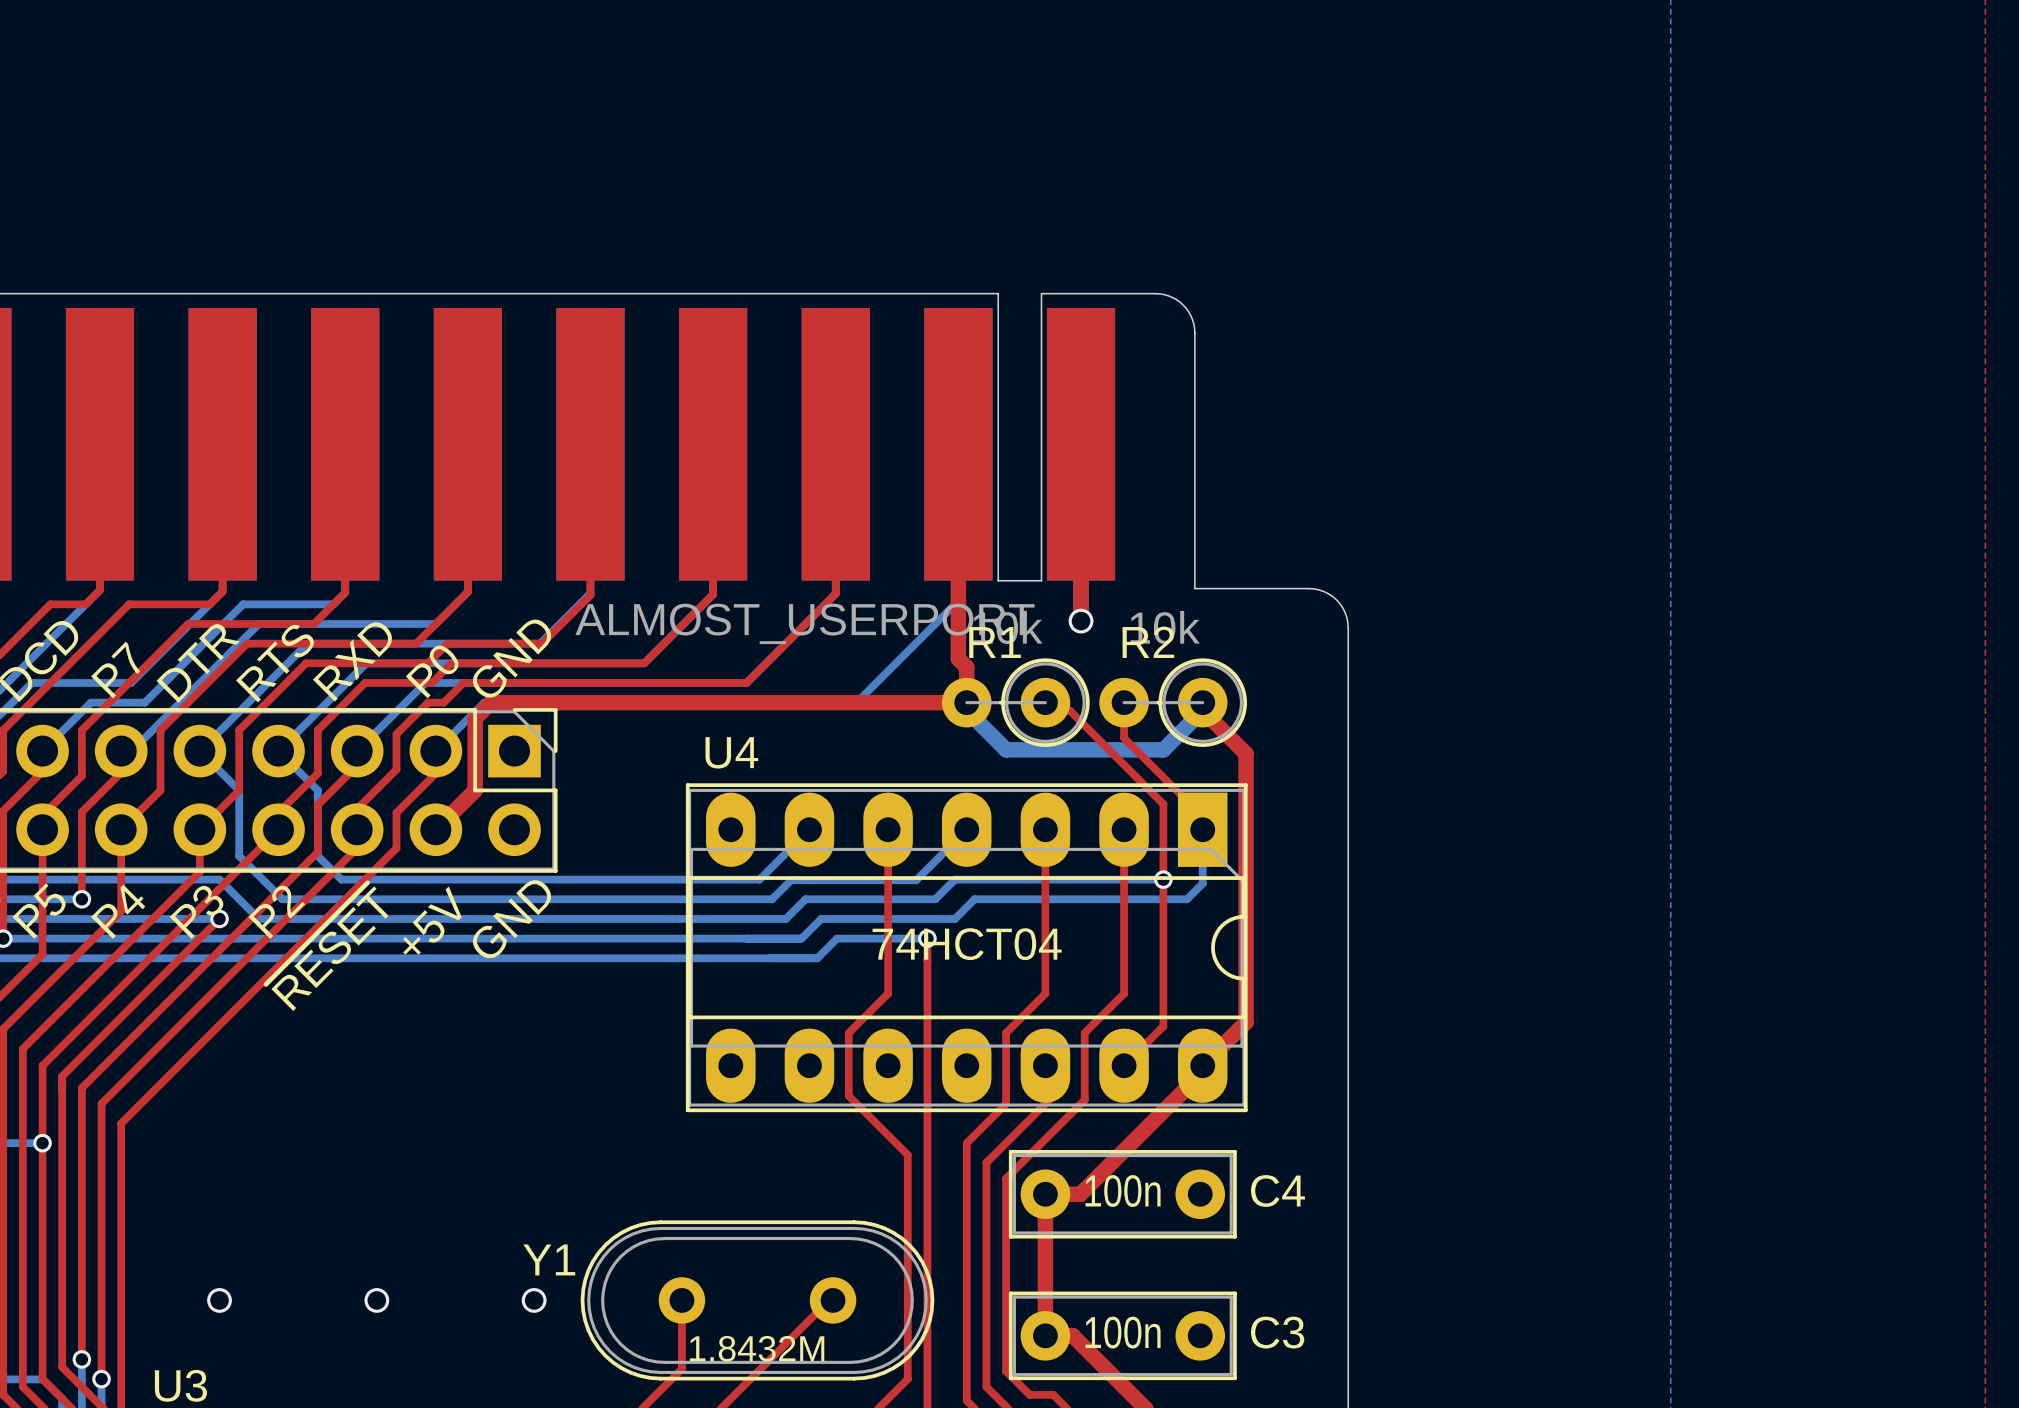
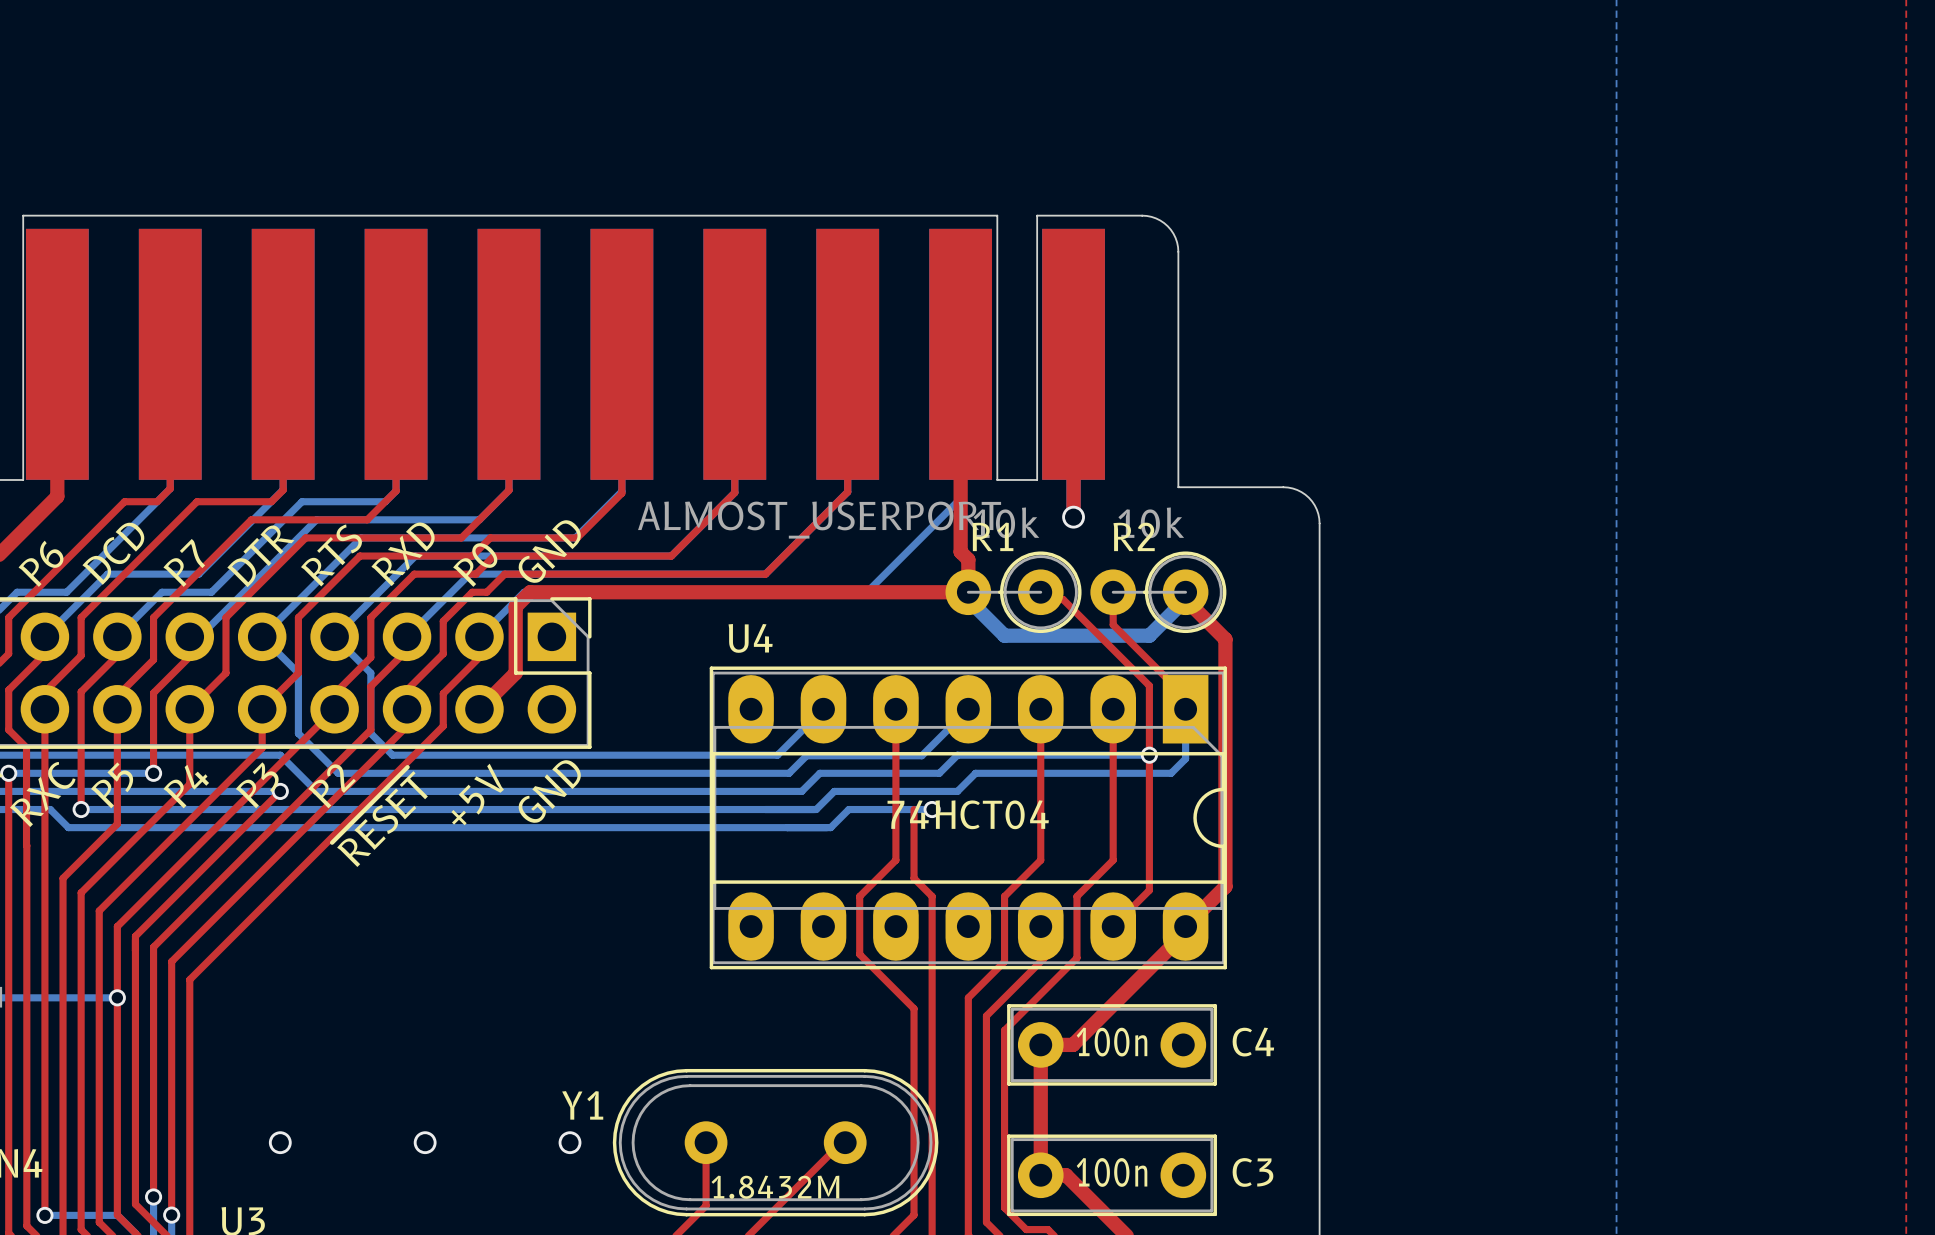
top track: (927, 938) (927, 1033) -> (914, 809) (914, 878) (932, 896)

